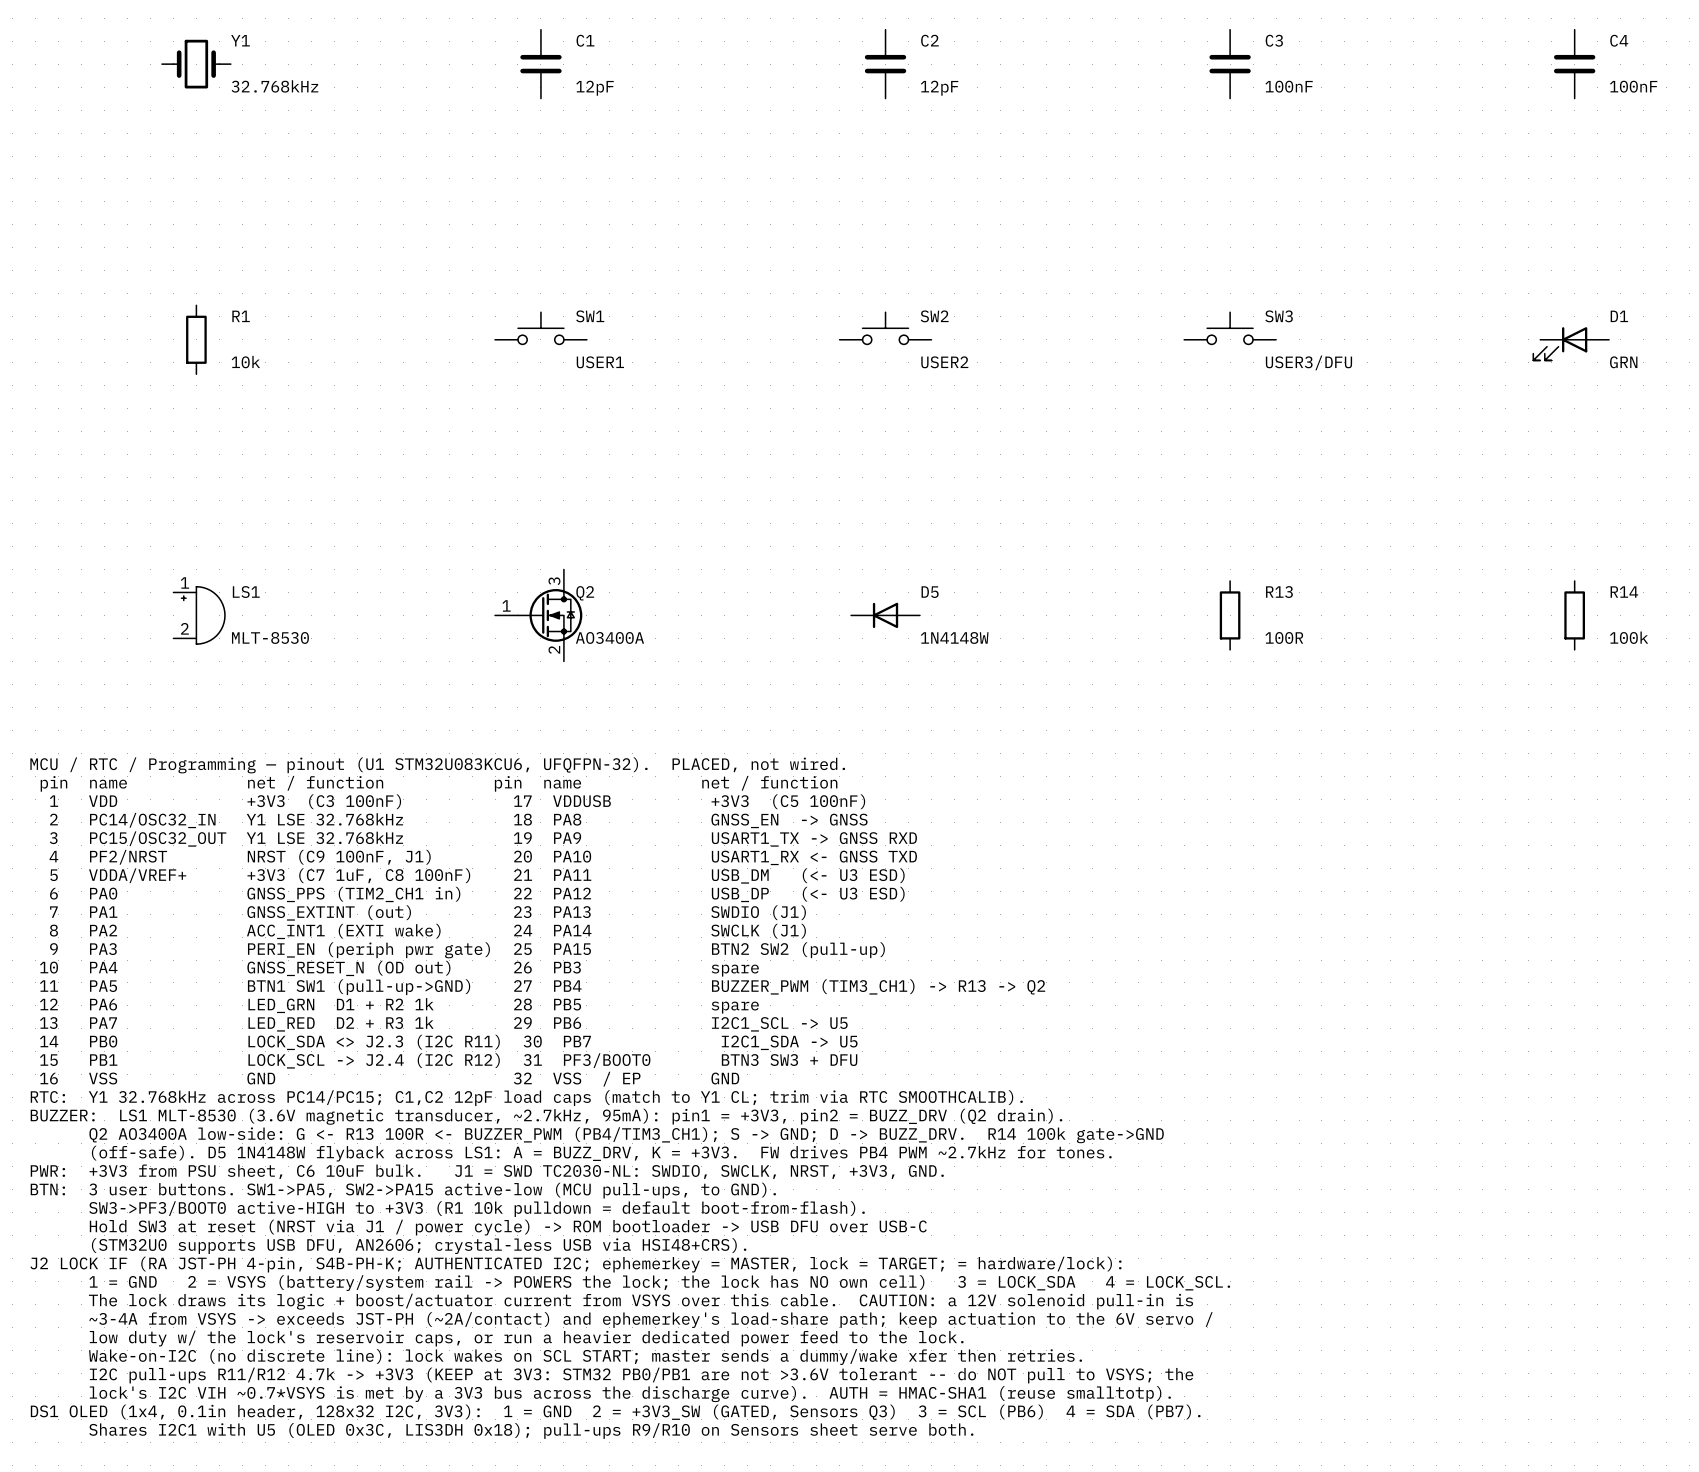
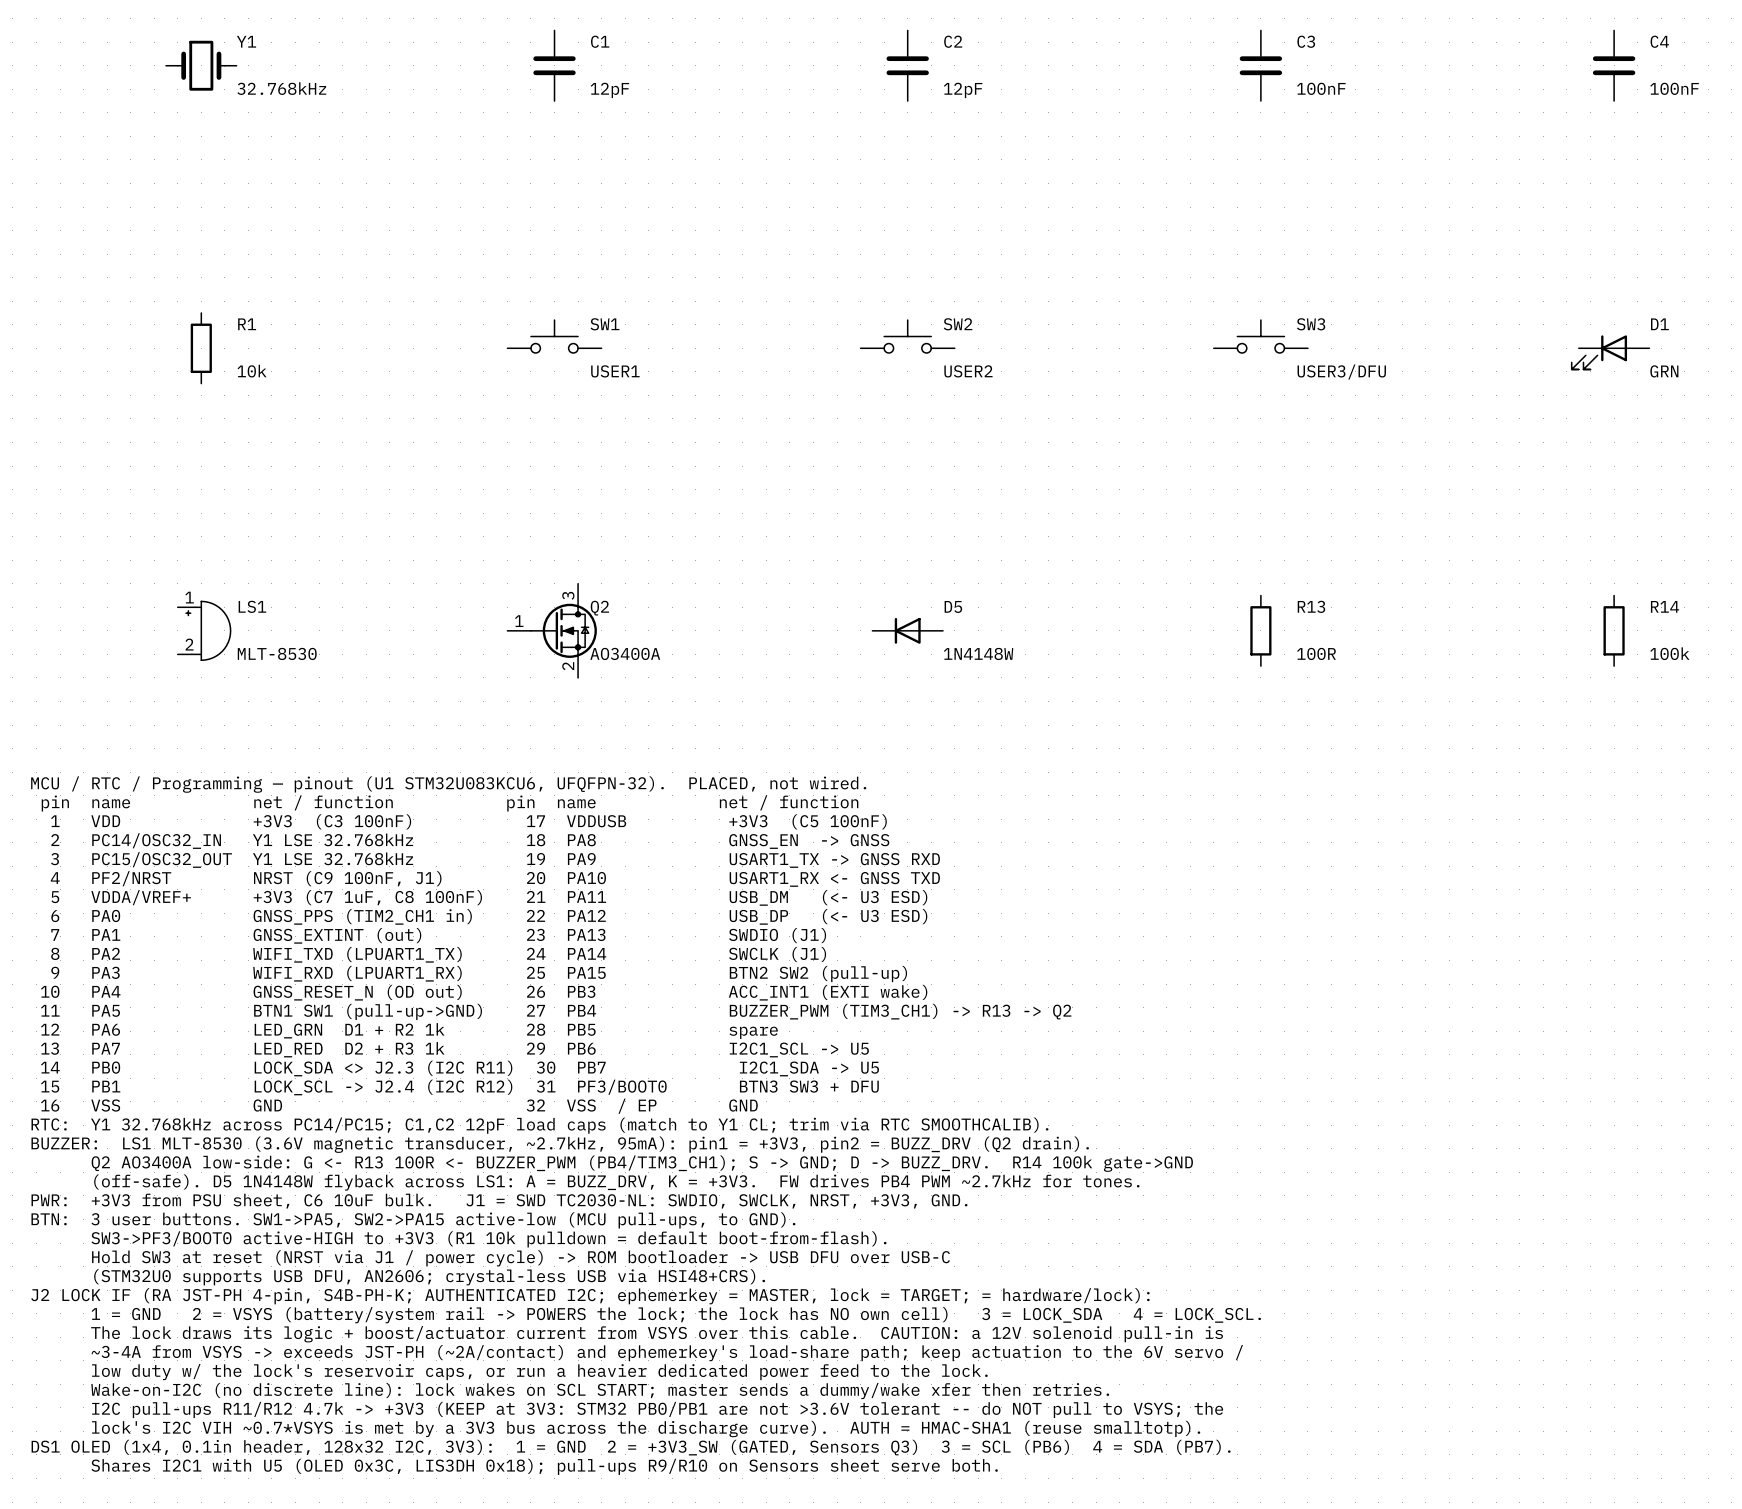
text: 8 PA2 ACC_INT1 (EXTI wake) 24 PA14 SWCLK (J1) (427, 931) -> 8 PA2 WIFI_TXD (LPUART1_TX) 24 PA14 SWCLK (J1) (438, 954)
text: 9 PA3 PERI_EN (periph pwr gate) 25 PA15 BTN2 SW2 (pull-up) (467, 950) -> 9 PA3 WIFI_RXD (LPUART1_RX) 25 PA15 BTN2 SW2 (pull-up) (479, 974)
text: 10 PA4 GNSS_RESET_N (OD out) 26 PB3 spare (399, 968) -> 10 PA4 GNSS_RESET_N (OD out) 26 PB3 ACC_INT1 (EXTI wake) (484, 992)

